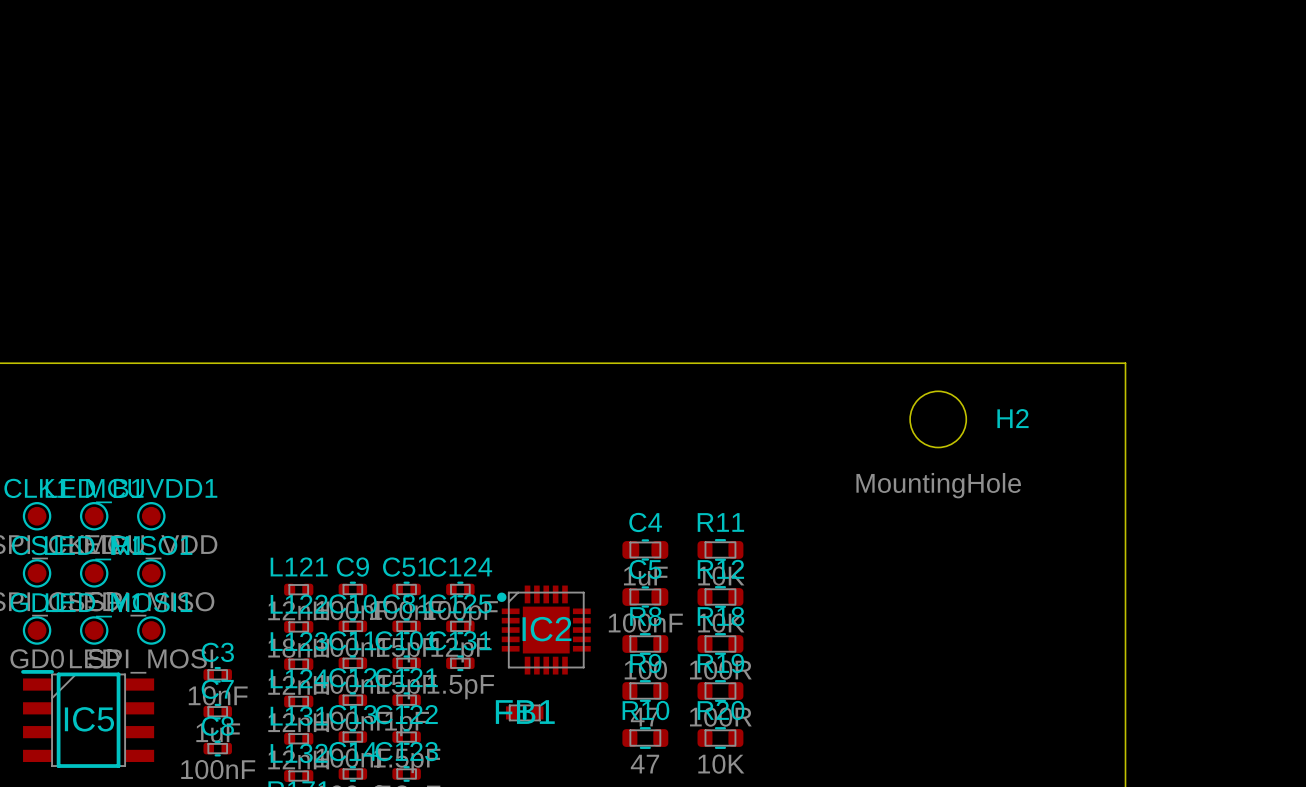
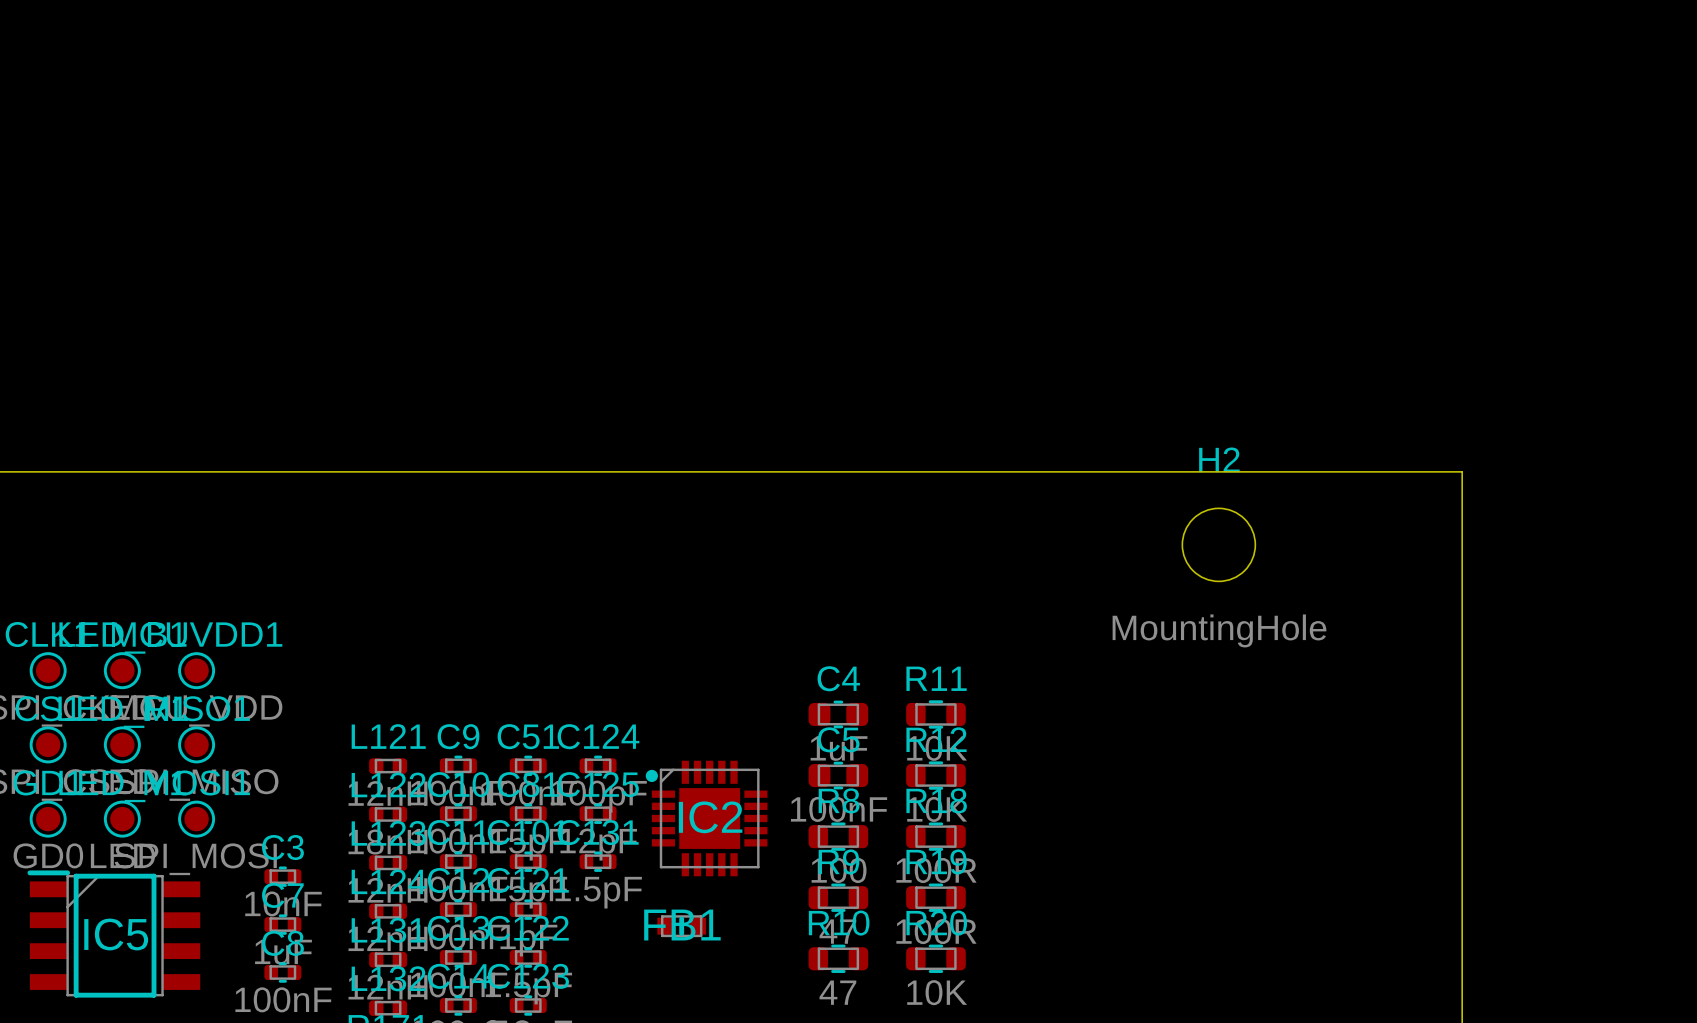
H2 name position: H2 (1012, 418) -> H2 (1219, 459)

